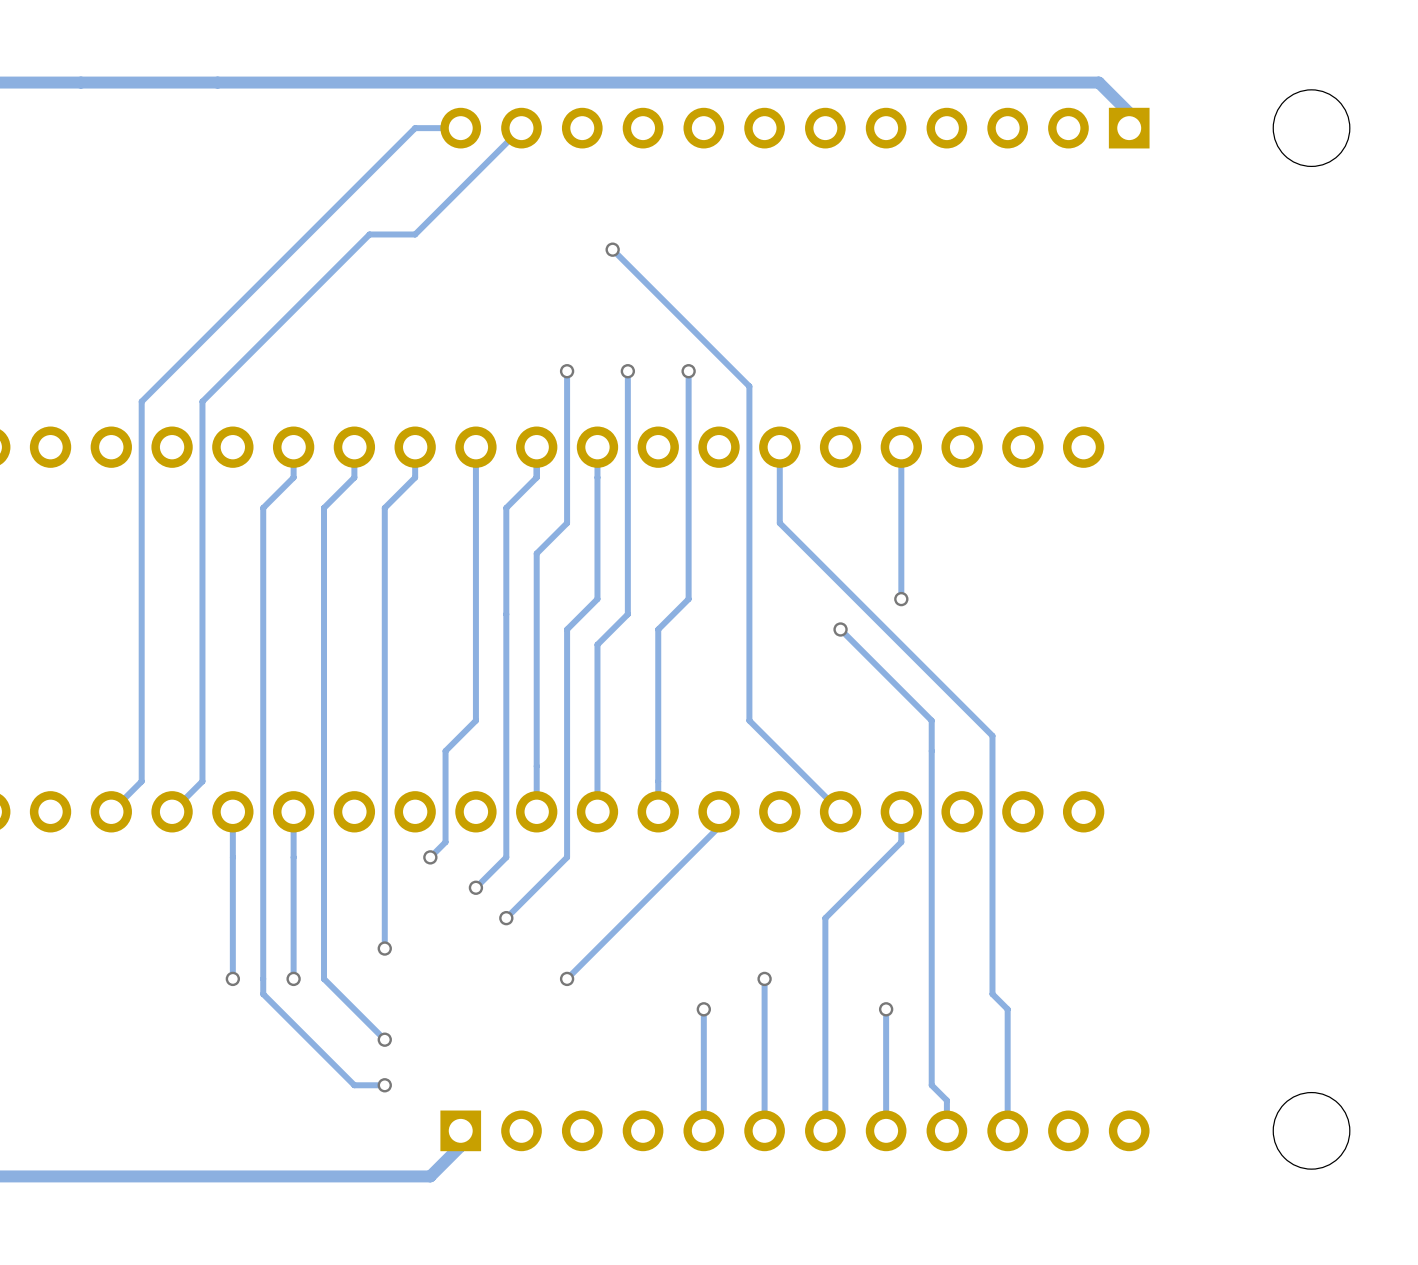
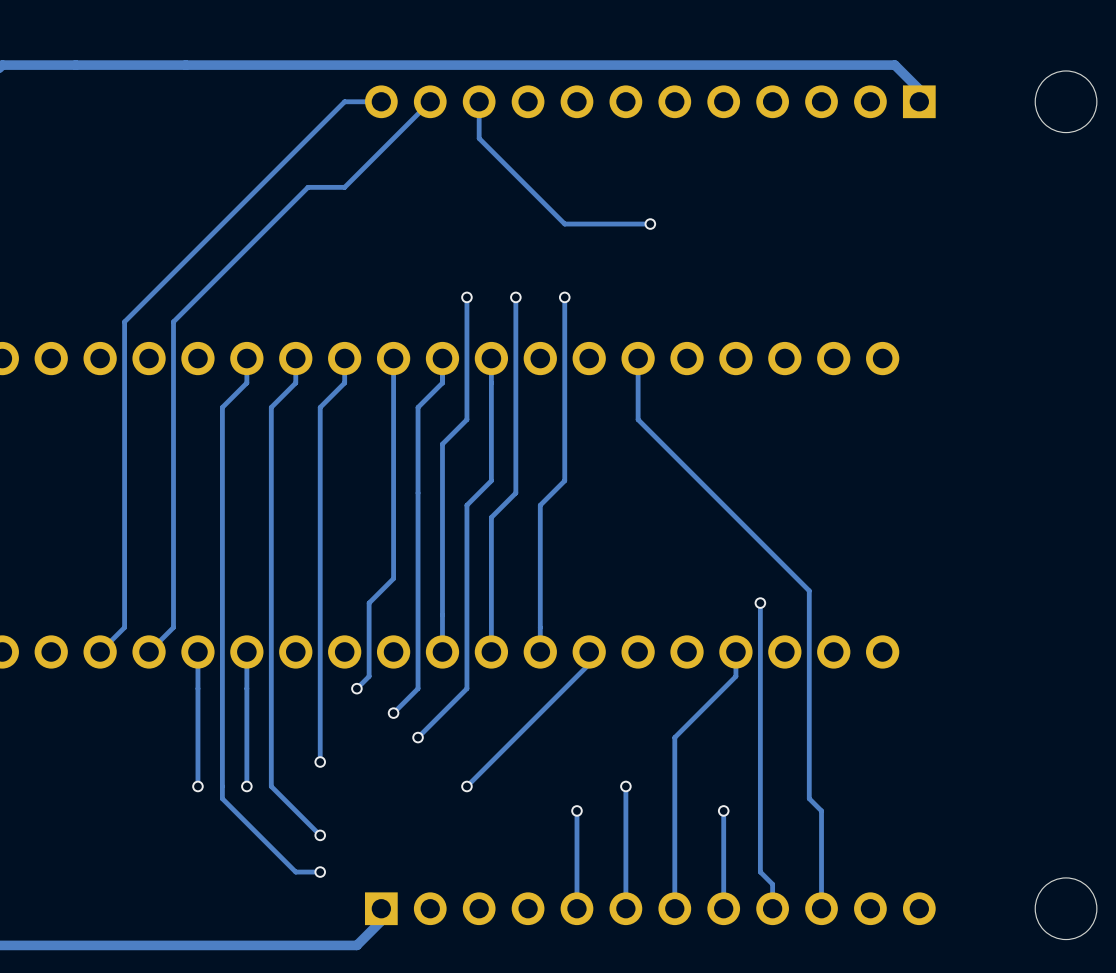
track: none -> (479, 101) (479, 138) (564, 224) (650, 224)
track: (612, 249) (749, 386) (749, 720) (840, 811) -> none
via: (612, 249) -> none
via: none -> (650, 224)
track: (901, 447) (901, 599) -> none
via: (901, 599) -> none
track: (840, 629) (931, 720) (931, 751) -> none
via: (840, 629) -> none
via: none -> (760, 603)

